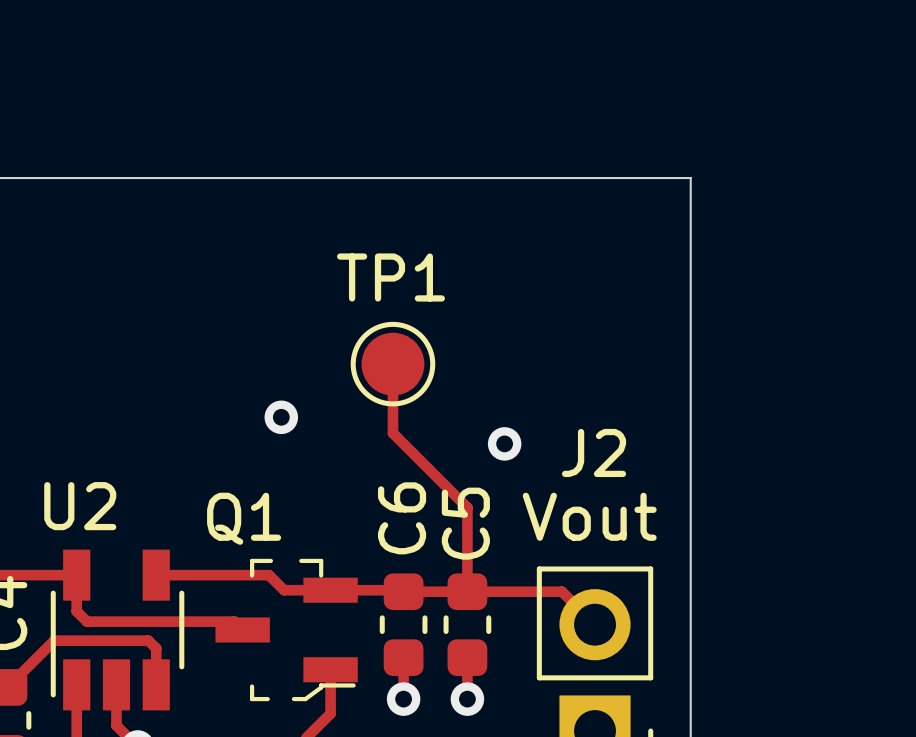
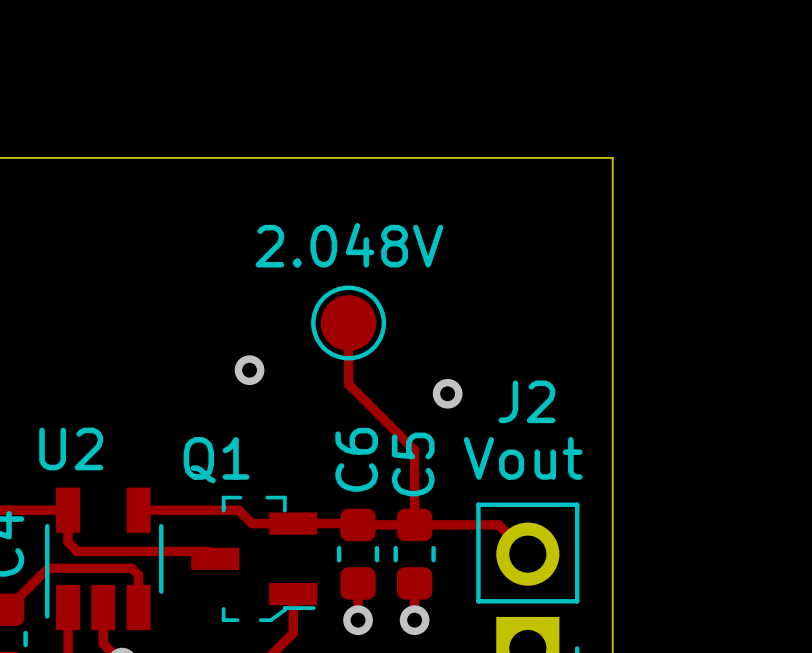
TP1 name: TP1 (390, 277) -> 2.048V (349, 245)

